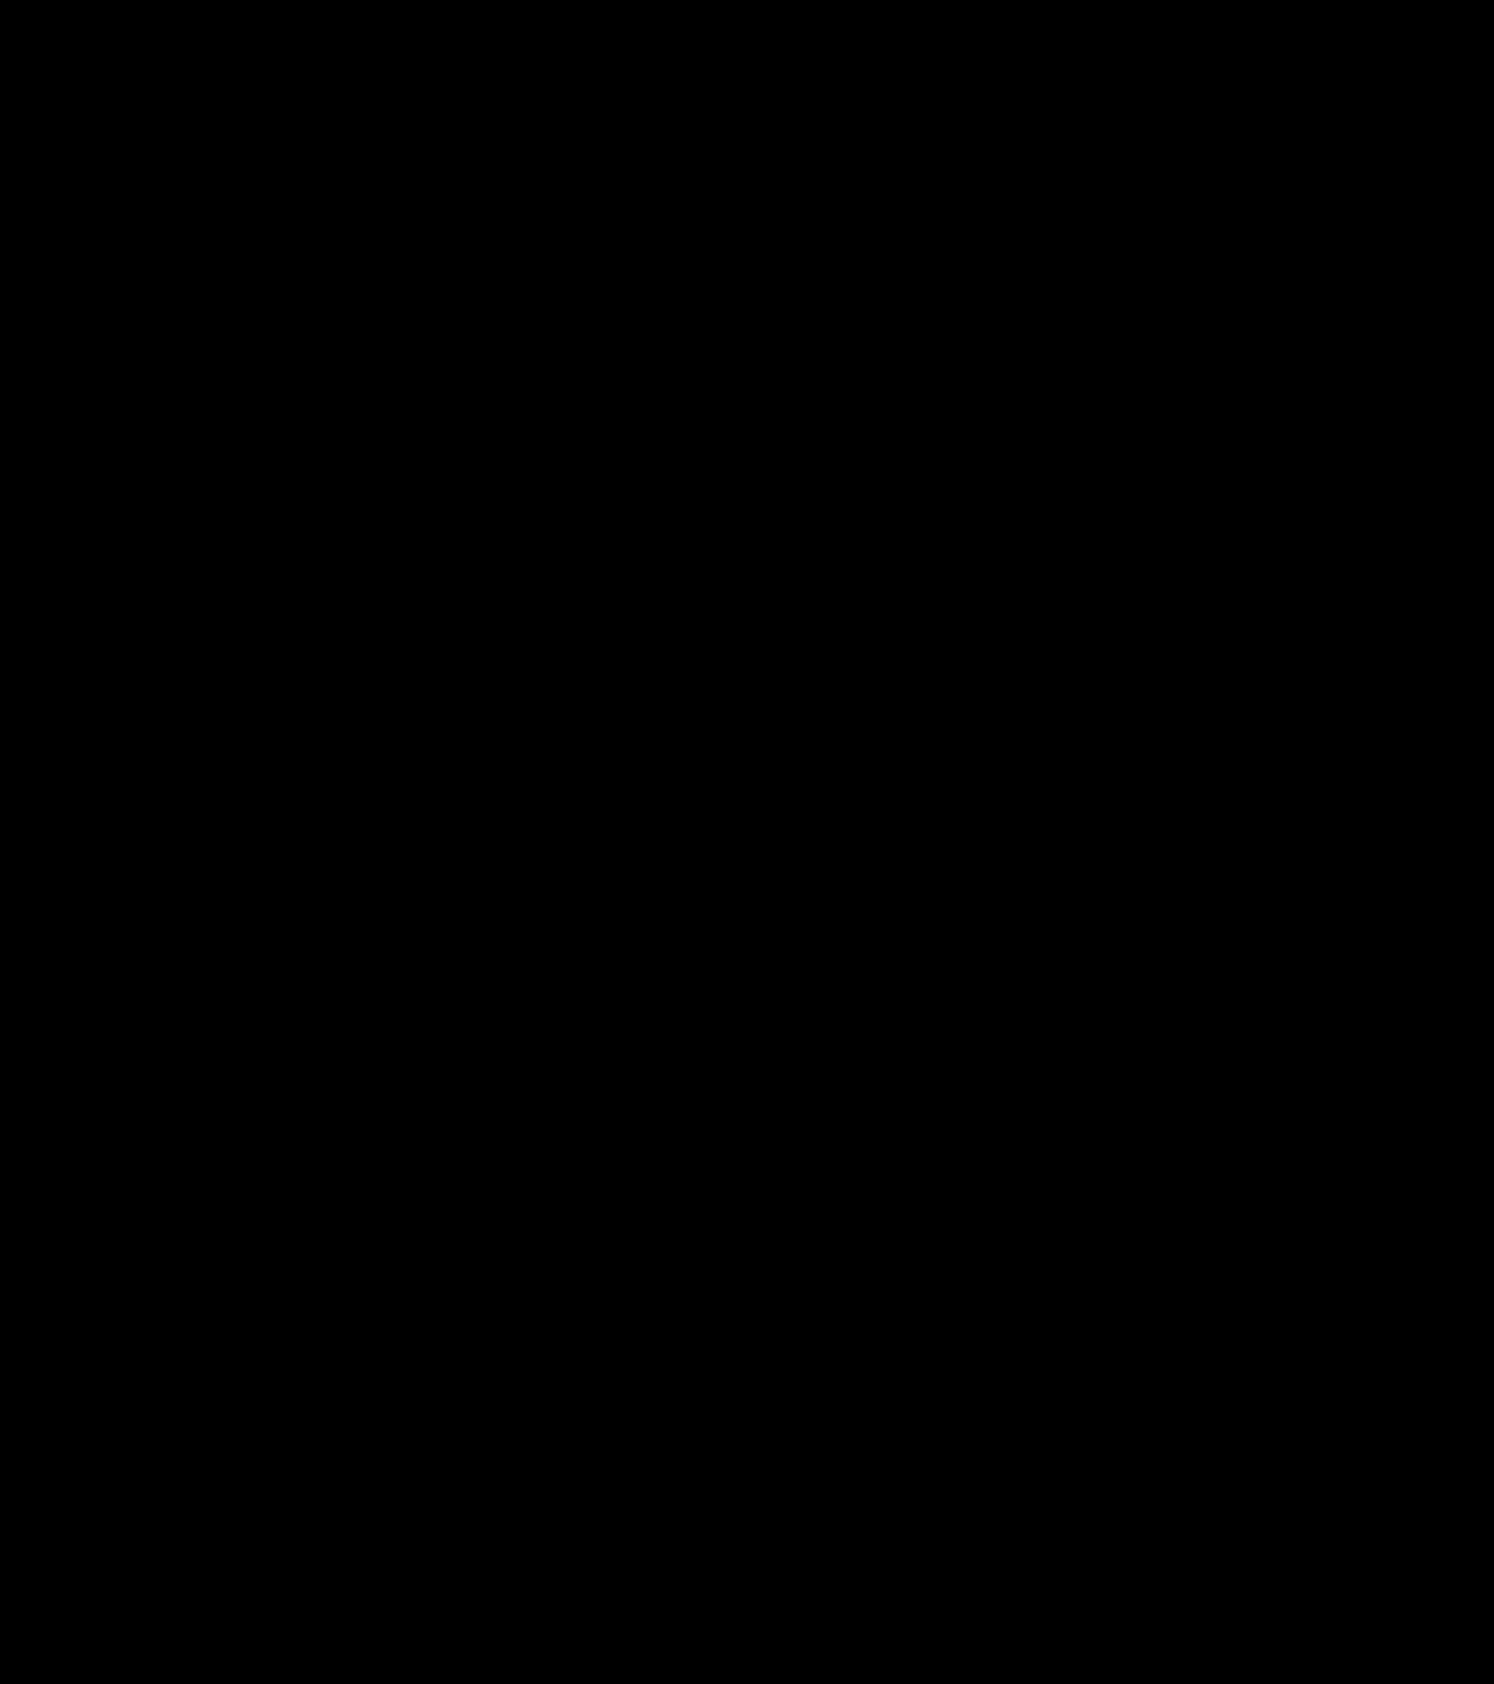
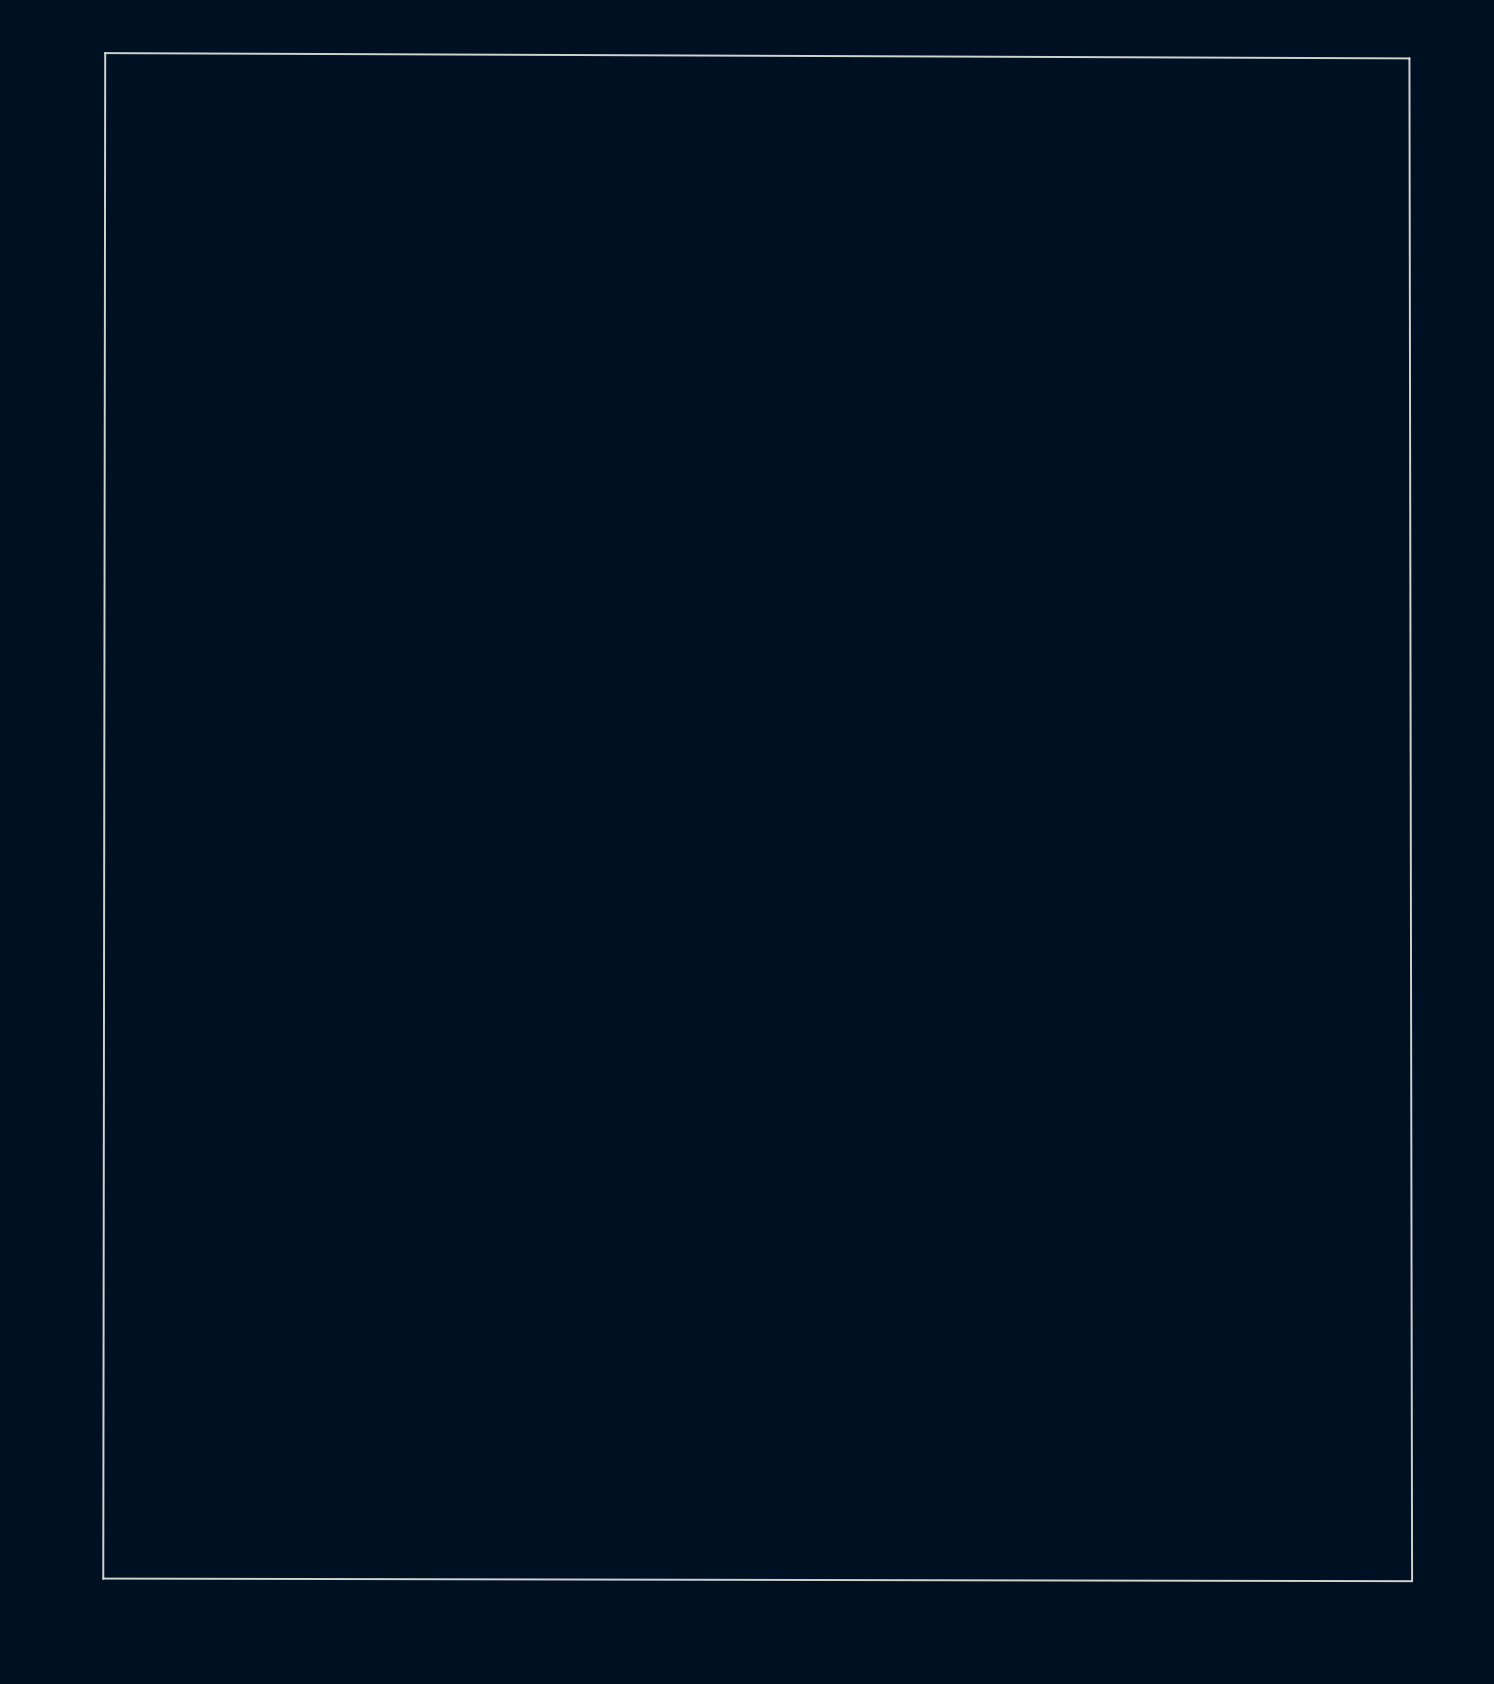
board edge: none -> (105, 53) (103, 1578) (1412, 1581) (1409, 58) (105, 53)

